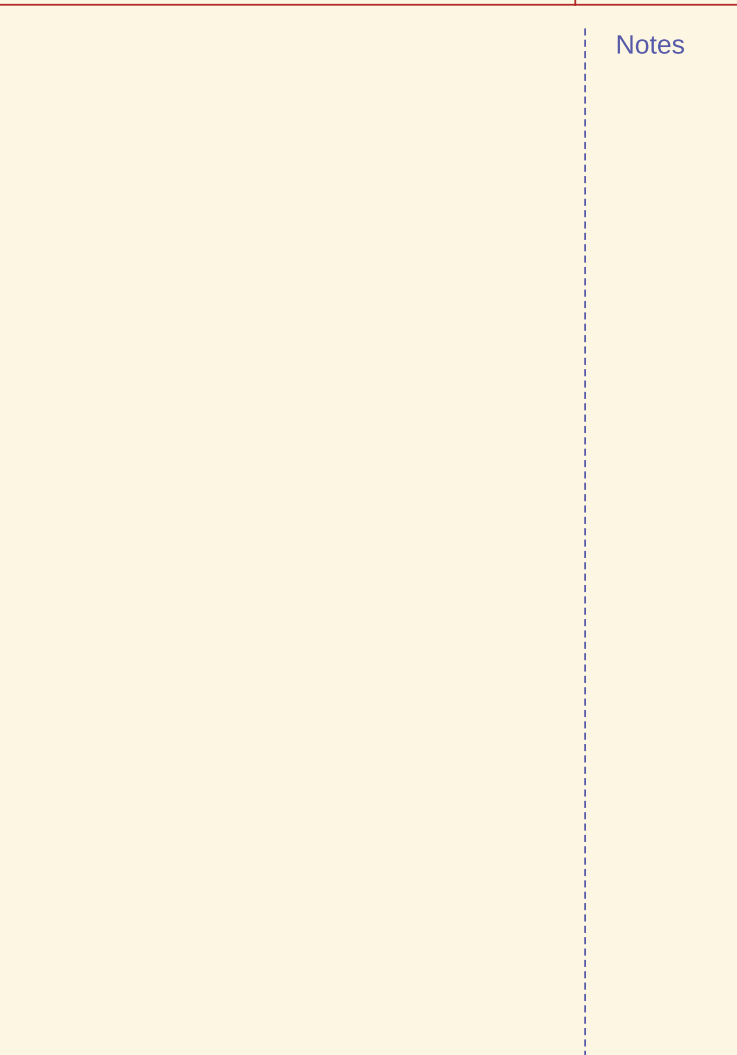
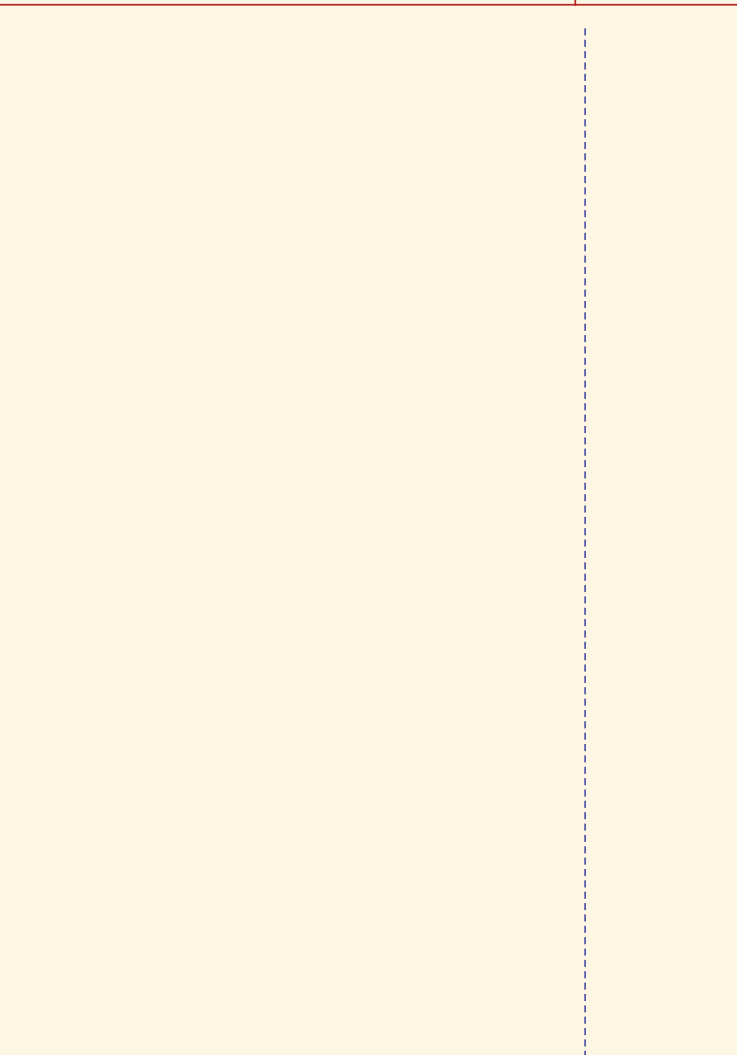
text: Notes (650, 44) -> none

